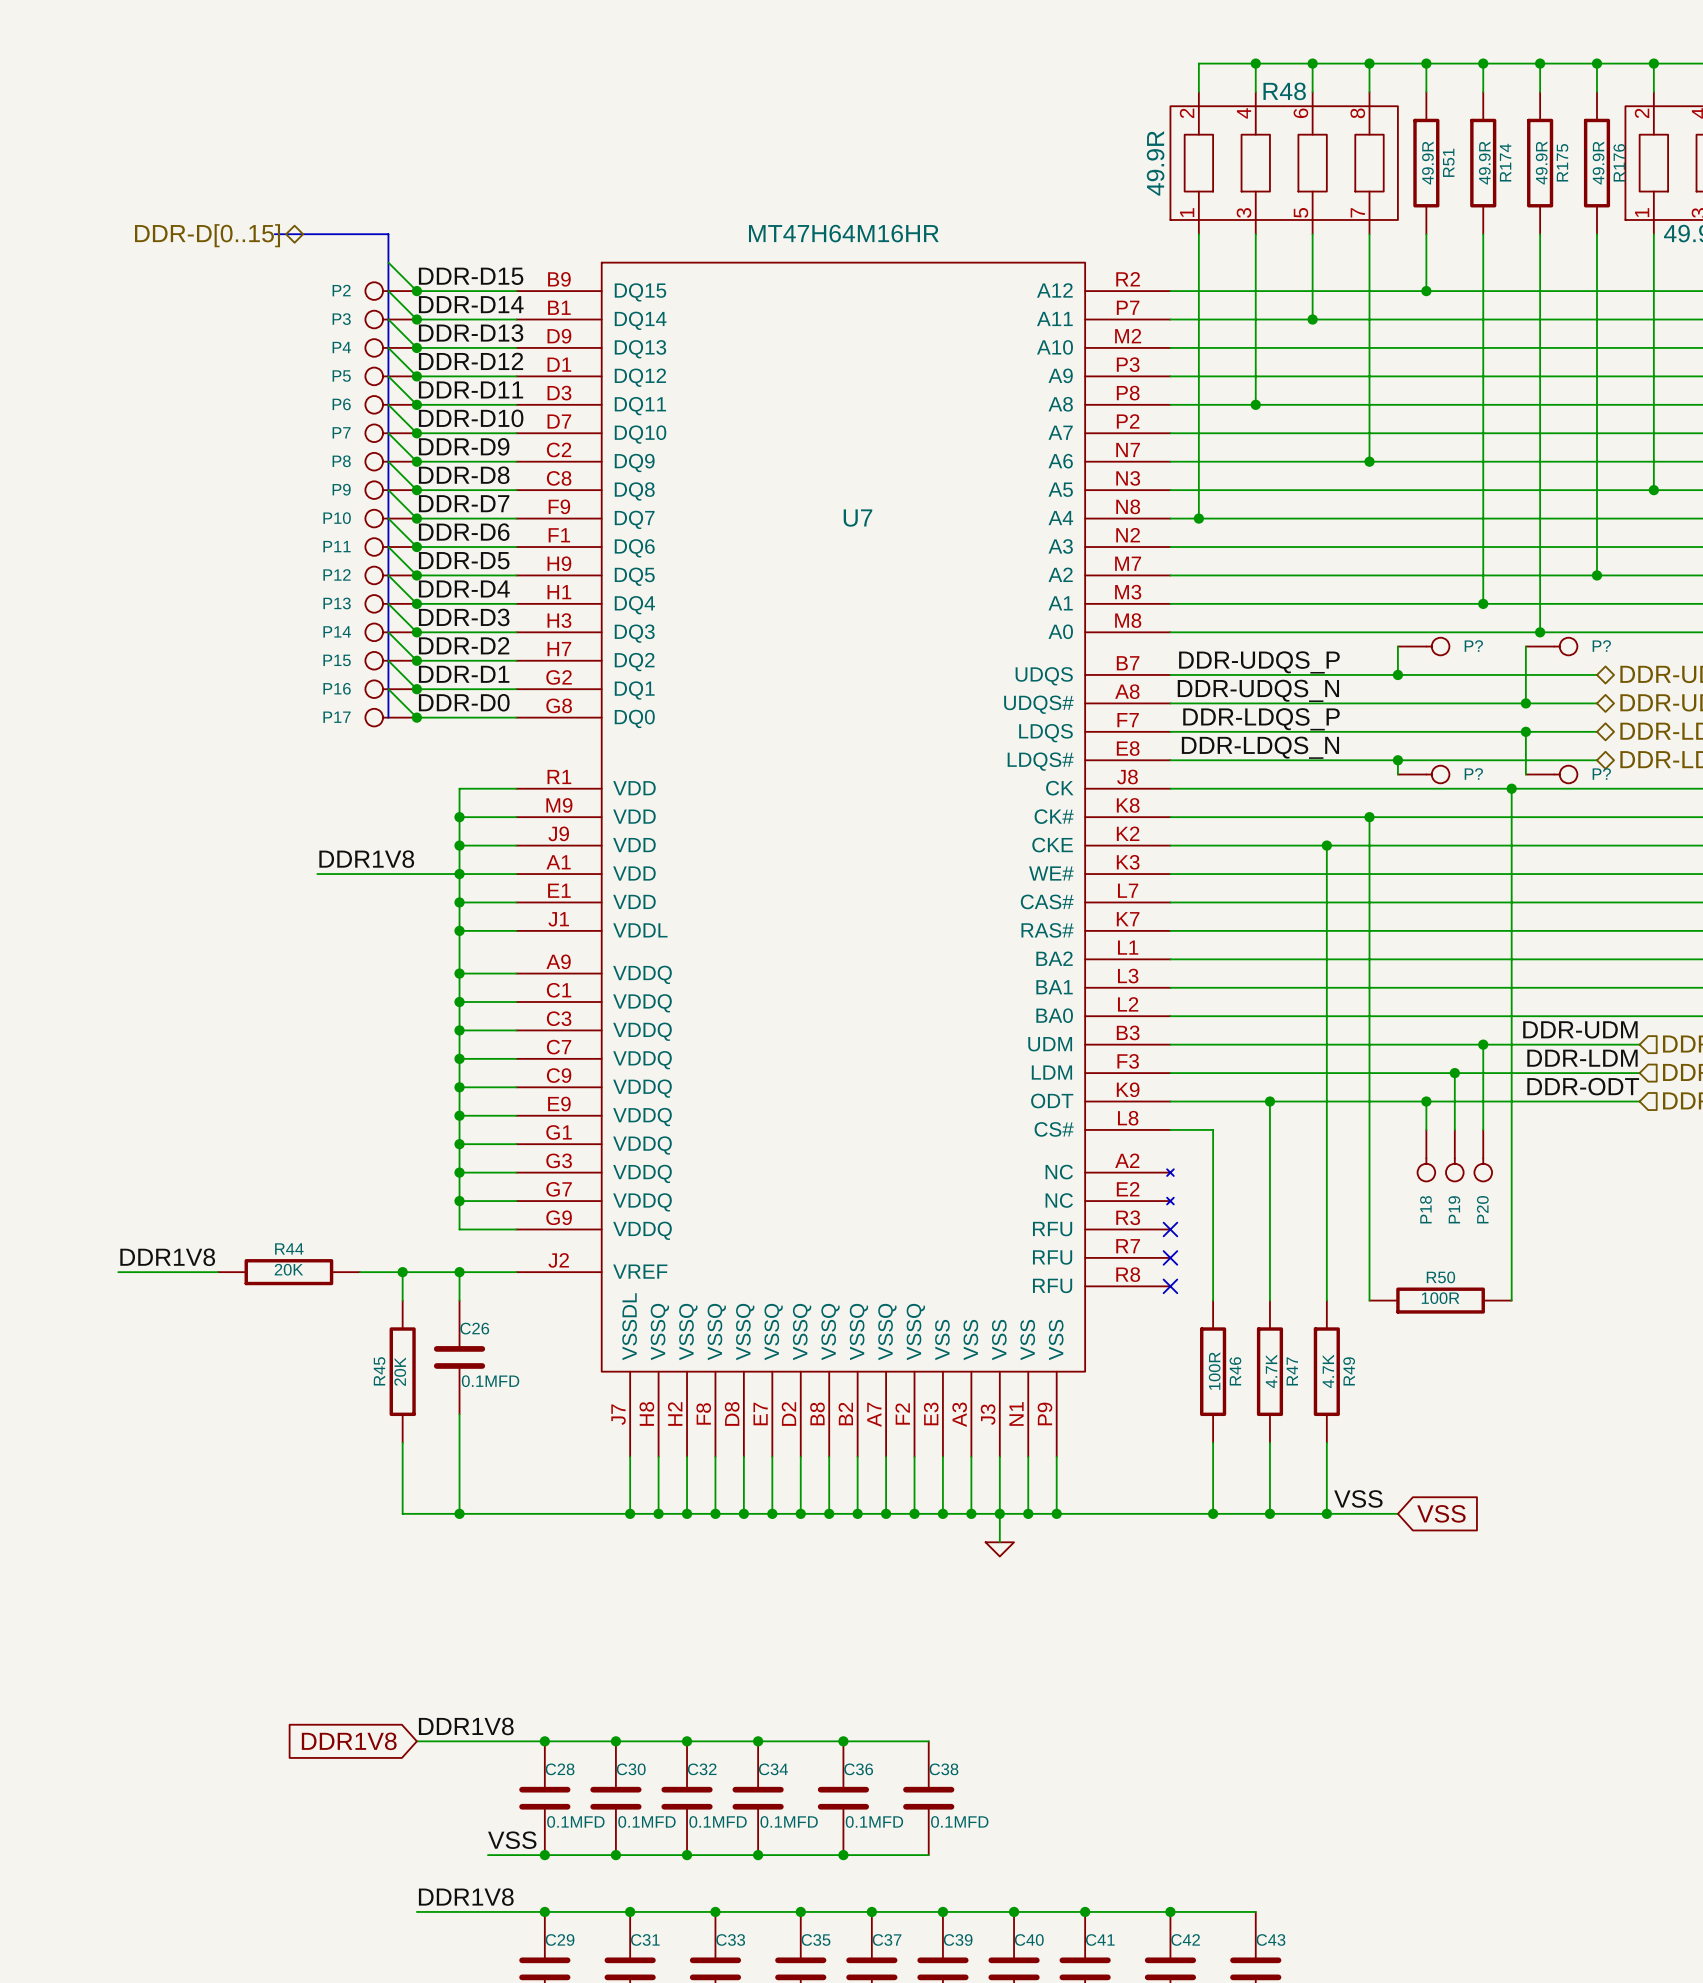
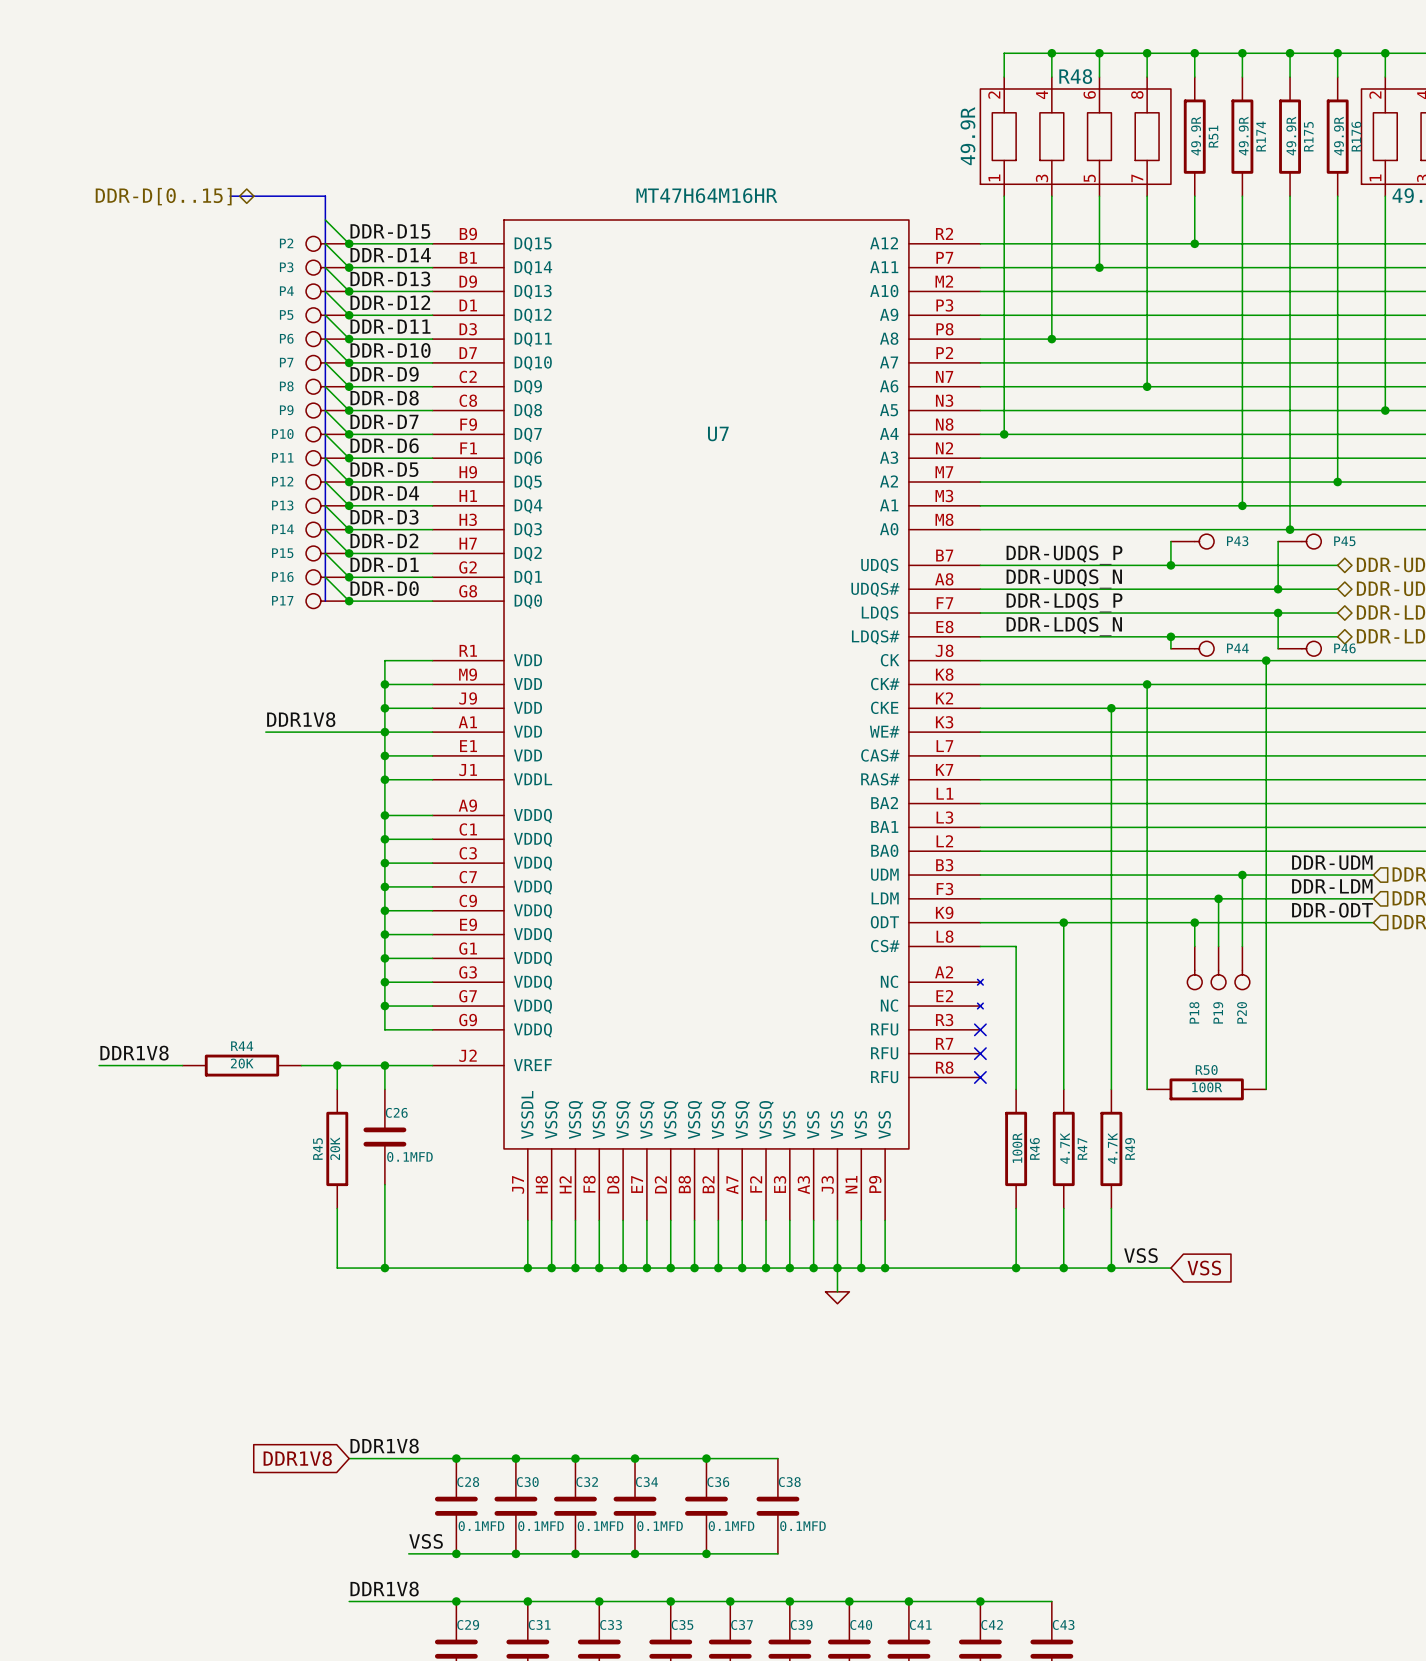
P? name: P? (1473, 646) -> P43 (1237, 541)
P? name: P? (1601, 646) -> P45 (1344, 541)
P? name: P? (1473, 773) -> P44 (1237, 648)
P? name: P? (1601, 773) -> P46 (1344, 648)

